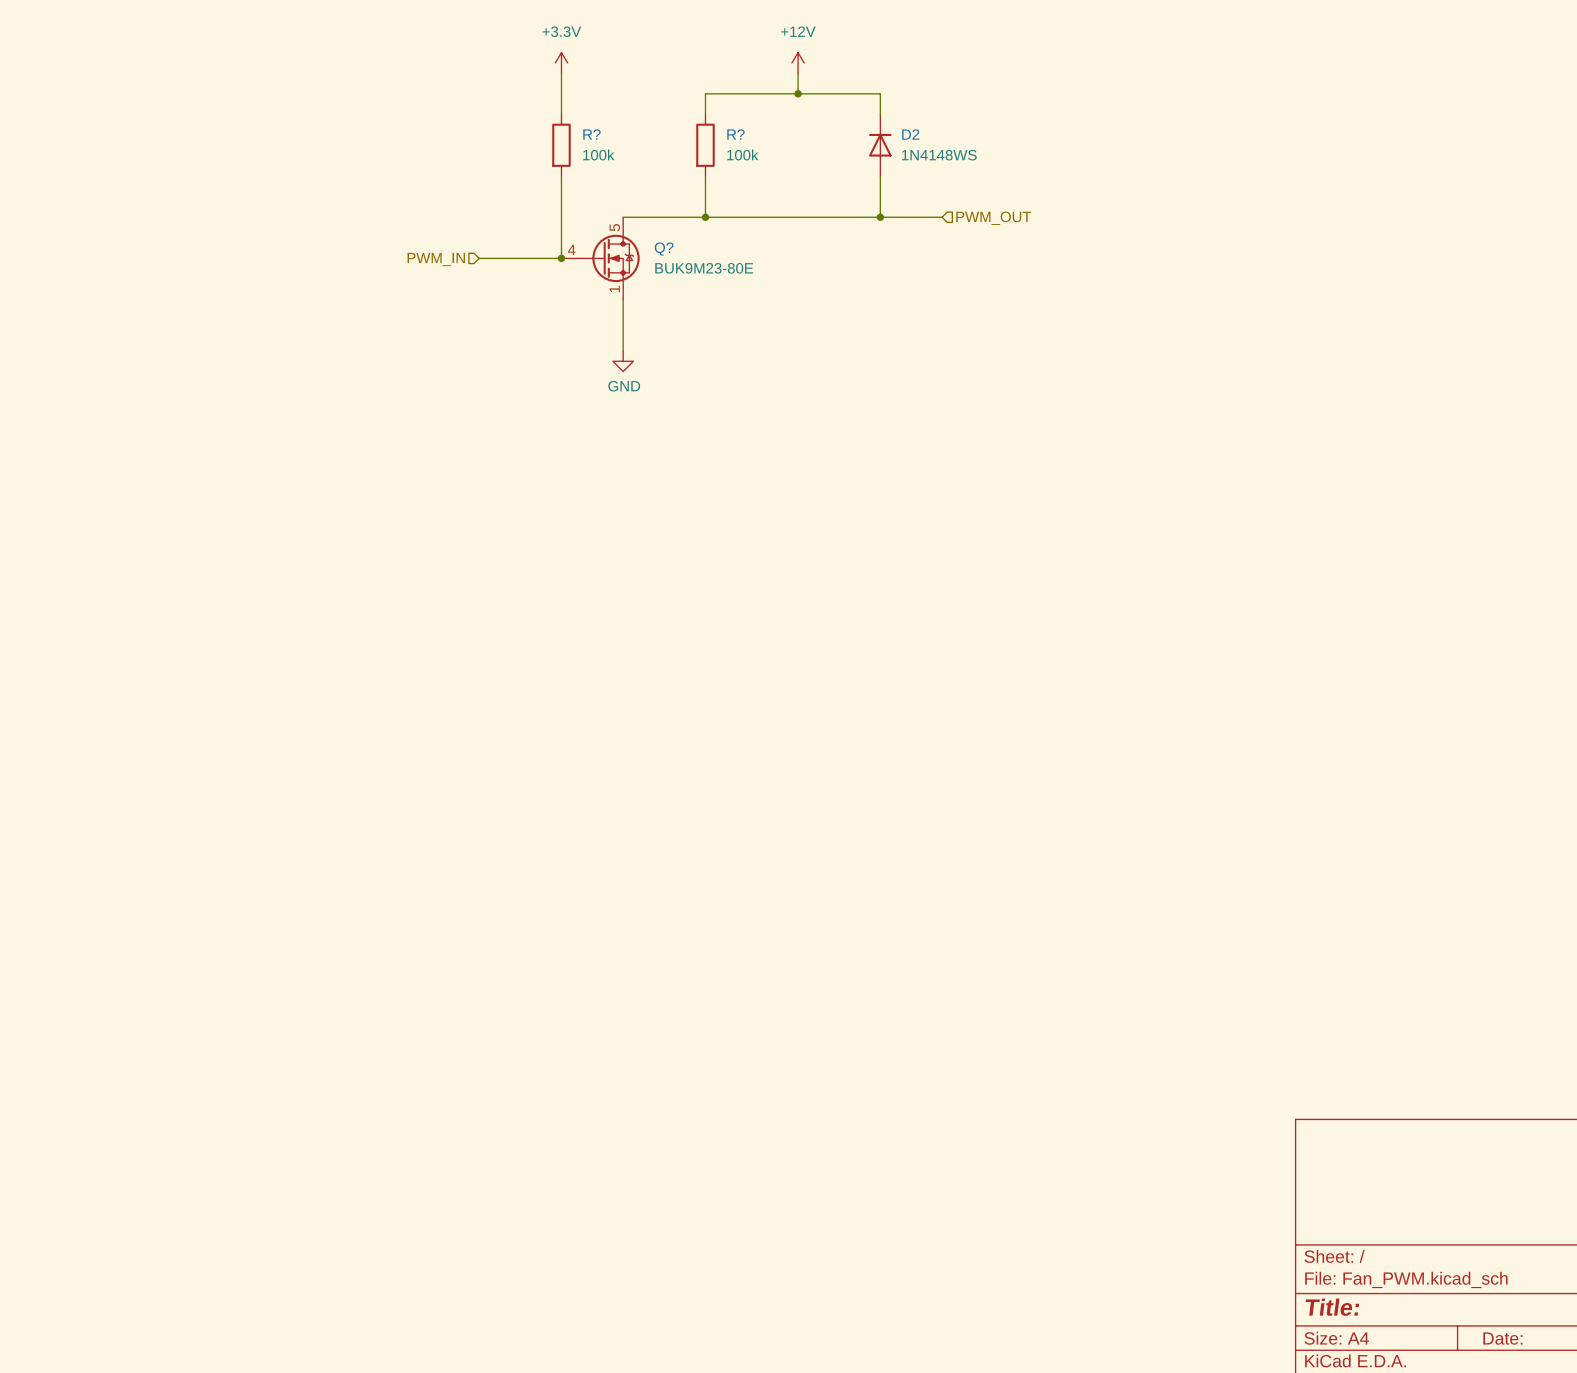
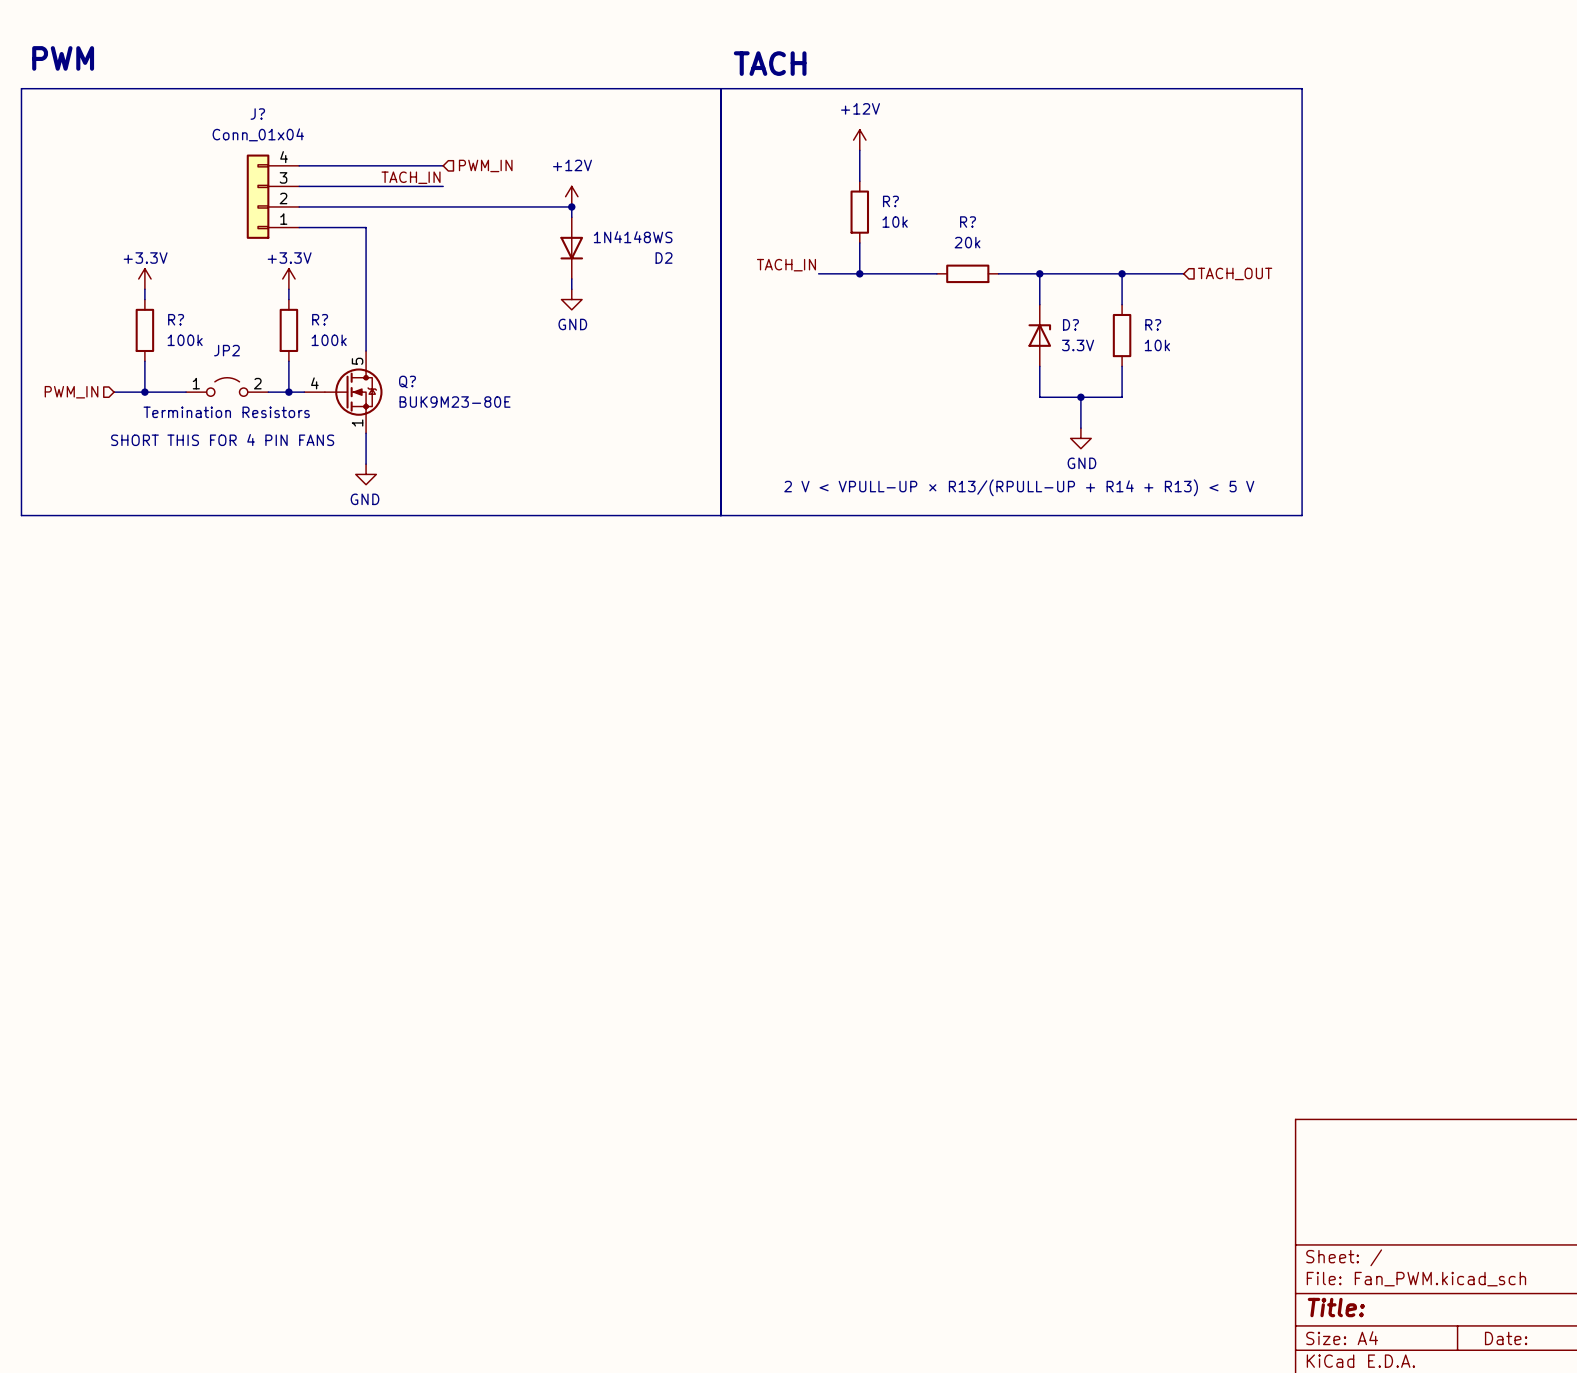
text: none -> PWM (63, 58)
power symbol: +3.3V (561, 62) -> none
power symbol position: +12V (798, 62) -> +12V (859, 140)
text: none -> TACH (770, 63)
wire: (561, 73) (561, 114) -> none
wire: (798, 73) (798, 93) -> none
line: none -> (21, 88) (1302, 88) (1302, 515) (21, 515) (21, 88)
line: none -> (720, 88) (720, 515)
junction: (798, 93) -> none
wire: (705, 114) (705, 93) (880, 93) (880, 114) -> none
D2 name position: D2 (910, 134) -> D2 (664, 258)
R?: 100k (561, 145) -> none
R?: 100k (705, 145) -> none
D2 rotation: 0° (880, 145) -> 180° (571, 248)
D2 position: (880, 145) -> (571, 248)
wire: none -> (859, 150) (859, 181)
D2 value position: 1N4148WS (939, 155) -> 1N4148WS (633, 237)
wire: none -> (299, 165) (443, 165)
wire: (561, 176) (561, 258) (479, 258) -> none
wire: (705, 176) (705, 217) -> none
wire: (880, 176) (880, 217) -> none
label: none -> TACH_IN (411, 177)
wire: none -> (299, 186) (443, 186)
J?: none -> Conn_01x04 (272, 196)
power symbol: none -> +12V (571, 196)
wire: none -> (299, 206) (571, 206) (571, 217)
junction: none -> (571, 206)
R?: none -> 10k (859, 212)
wire: (623, 217) (942, 217) -> none
junction: (705, 217) -> none
junction: (880, 217) -> none
hierarchical label: PWM_OUT (993, 218) -> none
wire: none -> (299, 227) (366, 227) (366, 350)
wire: none -> (859, 242) (859, 273)
junction: (561, 258) -> none
Q?: BUK9M23-80E (600, 258) -> none
hierarchical label rotation: 0° (436, 259) -> 180° (485, 165)
hierarchical label position: PWM_IN (436, 259) -> PWM_IN (485, 165)
label: none -> TACH_IN (786, 265)
wire: none -> (818, 273) (936, 273)
junction: none -> (859, 273)
R?: none -> 20k (967, 273)
wire: none -> (998, 273) (1183, 273)
wire: none -> (1039, 273) (1039, 304)
junction: none -> (1039, 273)
wire: none -> (1122, 273) (1122, 304)
junction: none -> (1122, 273)
hierarchical label: none -> TACH_OUT (1235, 273)
power symbol: none -> +3.3V (144, 278)
power symbol: none -> +3.3V (288, 278)
wire: none -> (571, 278) (571, 289)
wire: none -> (144, 289) (144, 299)
wire: none -> (288, 289) (288, 299)
wire: (623, 299) (623, 350) -> none
R?: none -> 100k (144, 330)
R?: none -> 100k (288, 330)
D?: none -> 3.3V (1039, 335)
R?: none -> 10k (1122, 335)
wire: none -> (144, 361) (144, 392)
wire: none -> (288, 361) (288, 392)
power symbol position: GND (623, 361) -> GND (571, 299)
wire: none -> (1039, 366) (1039, 397) (1122, 397) (1122, 366)
JP2: none -> Termination Resistors (227, 386)
wire: none -> (114, 392) (186, 392)
junction: none -> (144, 392)
wire: none -> (268, 392) (304, 392)
junction: none -> (288, 392)
Q?: none -> BUK9M23-80E (343, 392)
hierarchical label: none -> PWM_IN (71, 392)
wire: none -> (1080, 397) (1080, 428)
junction: none -> (1080, 397)
wire: none -> (366, 433) (366, 464)
power symbol: none -> GND (1080, 438)
text: none -> SHORT THIS FOR 4 PIN FANS (222, 440)
power symbol: none -> GND (366, 474)
text: none -> 2 V < VPULL-UP × R13/(RPULL-UP + R14 + R13) < 5 V (1019, 487)

